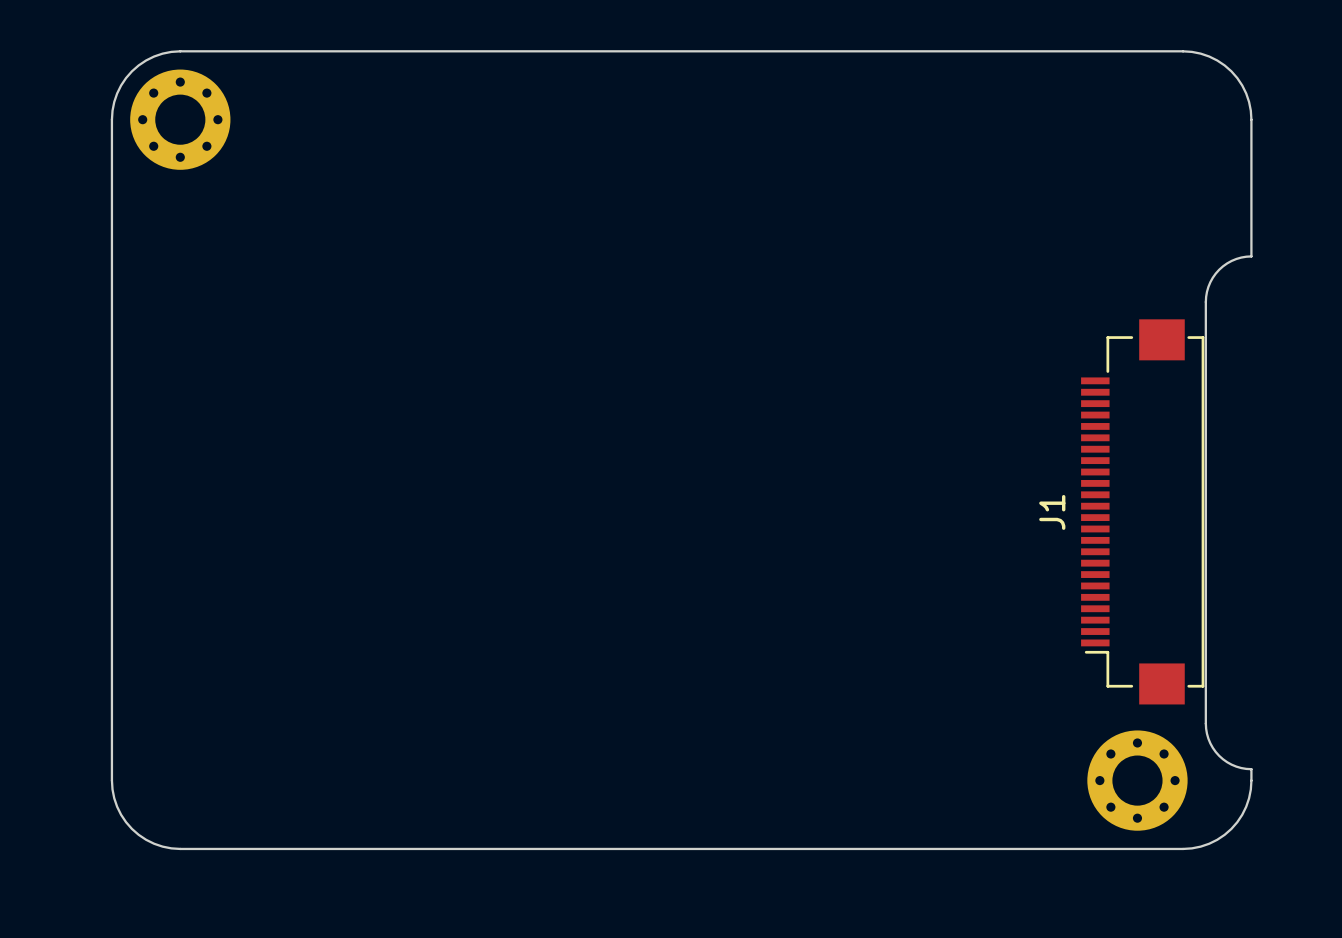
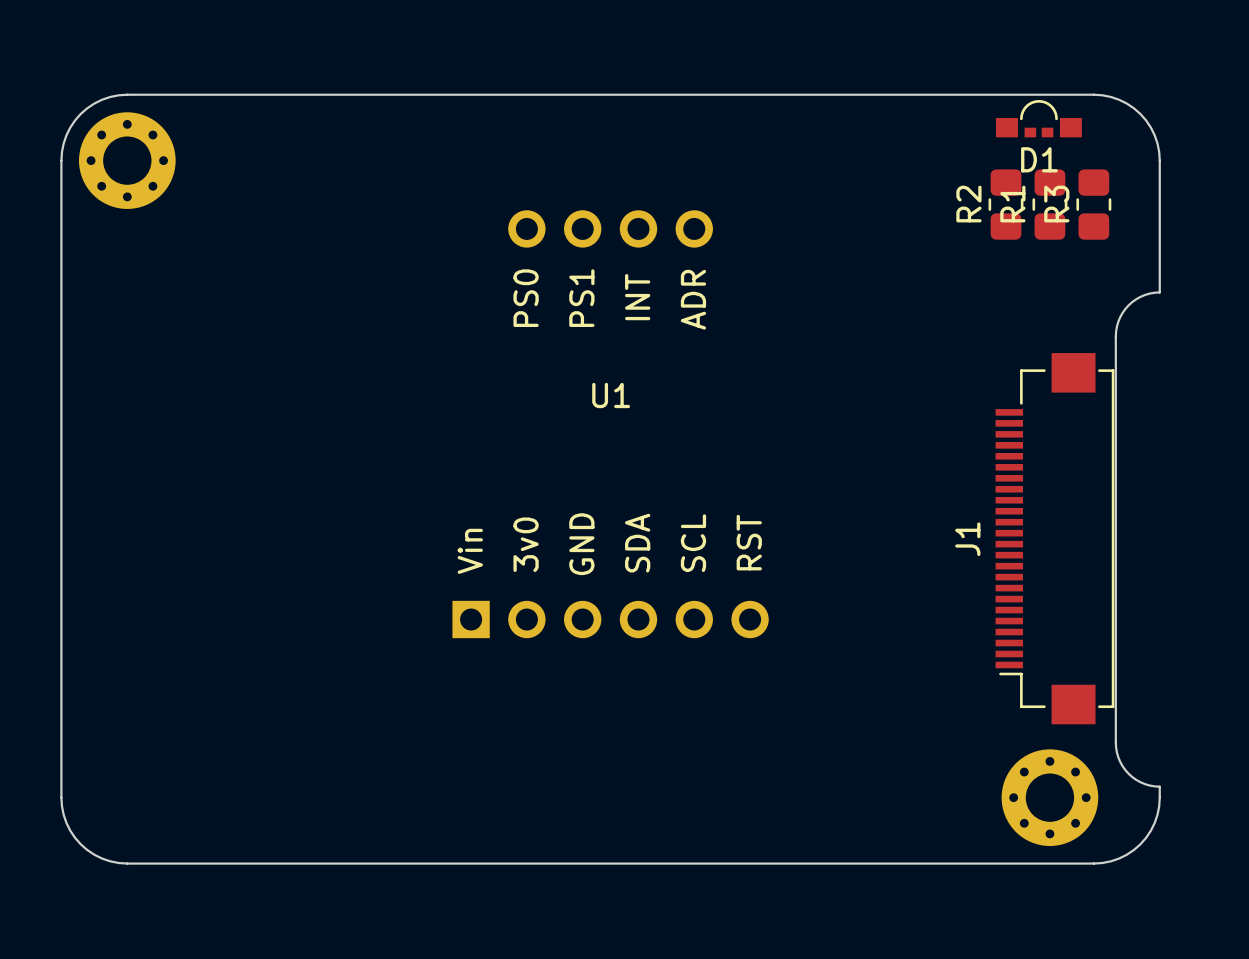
D1: none -> (1035, 118)
R2: none -> (1006, 204)
R1: none -> (1049, 204)
R3: none -> (1093, 204)
U1: none -> (610, 424)

